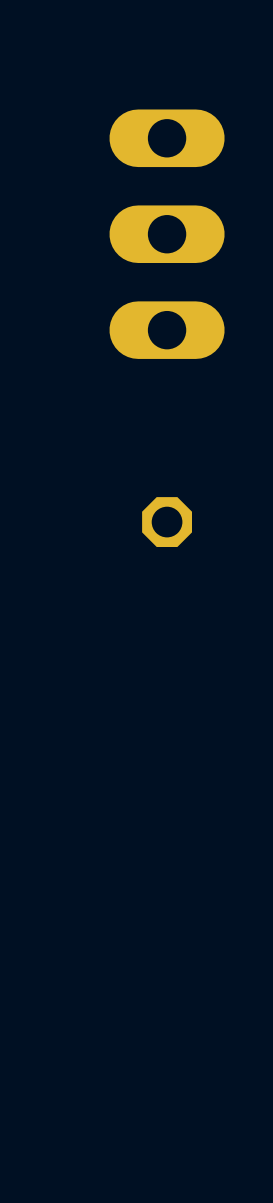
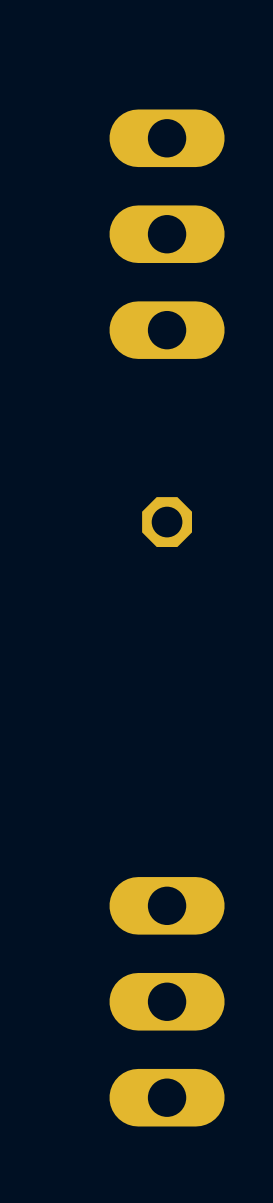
part: none -> (167, 1001)

